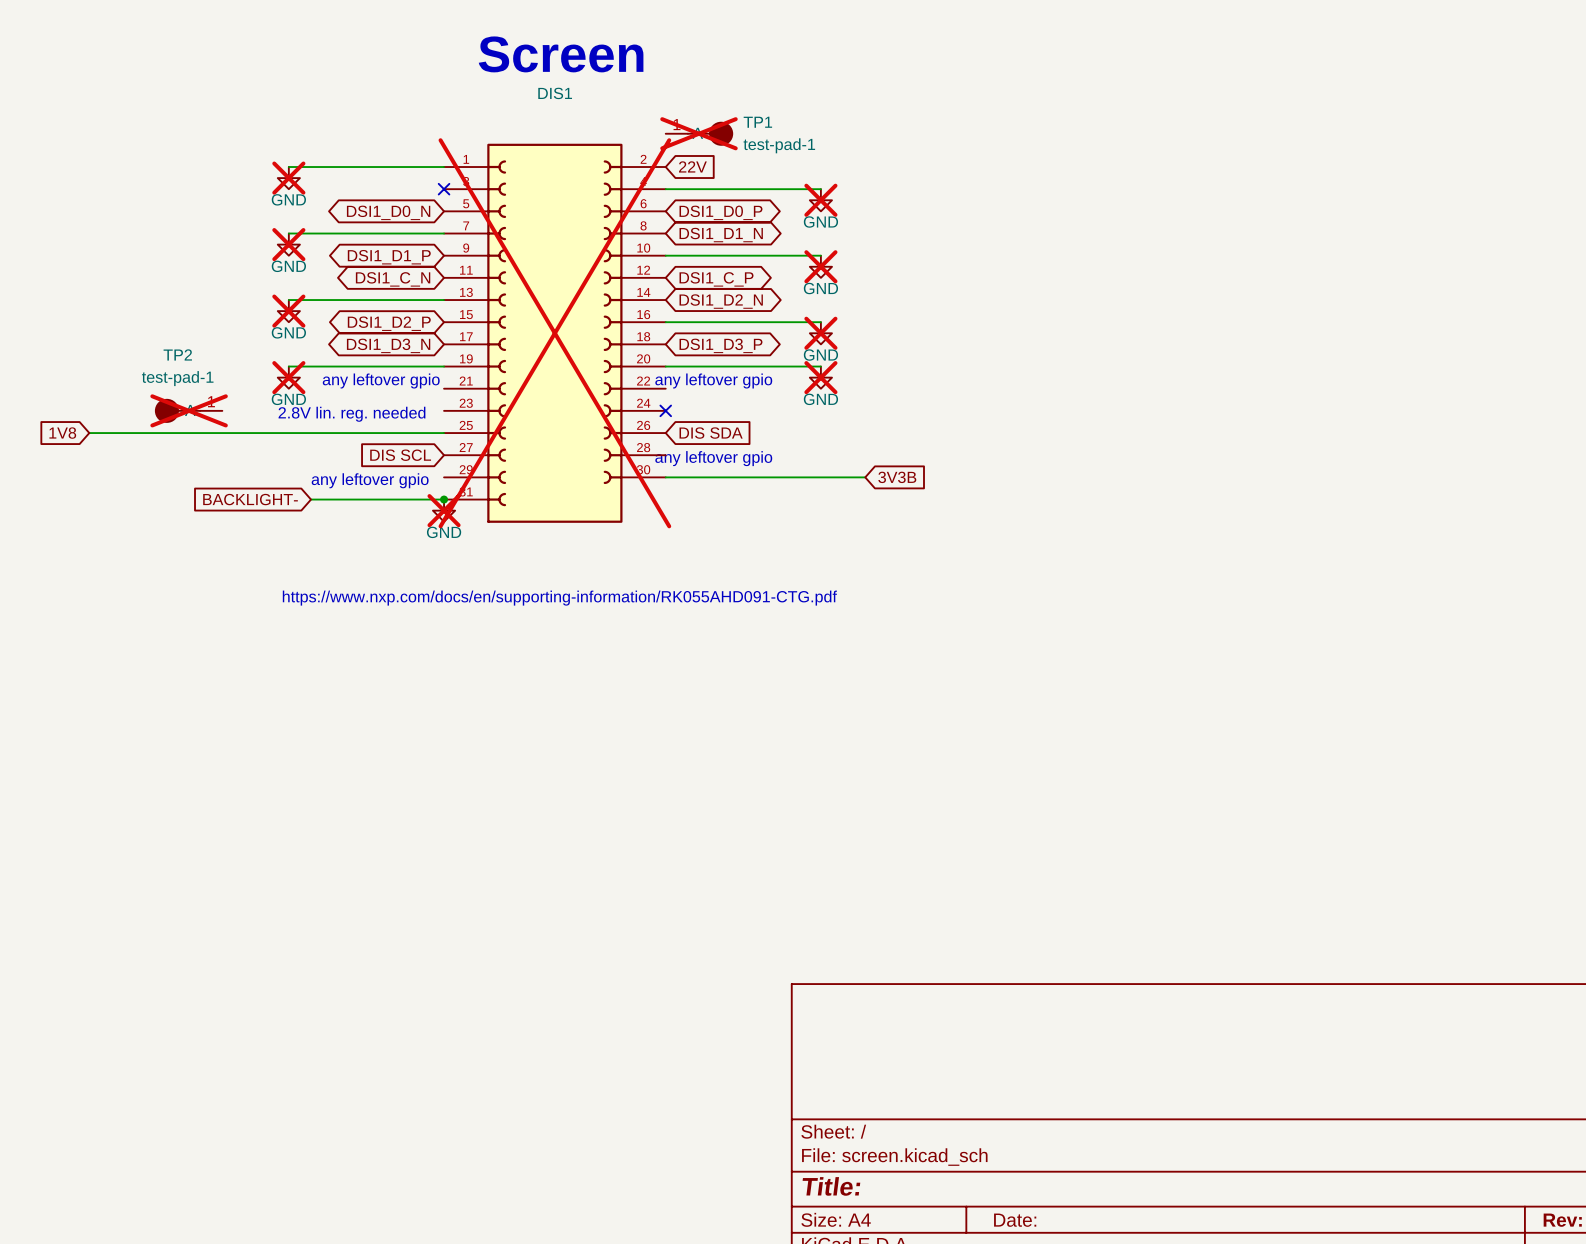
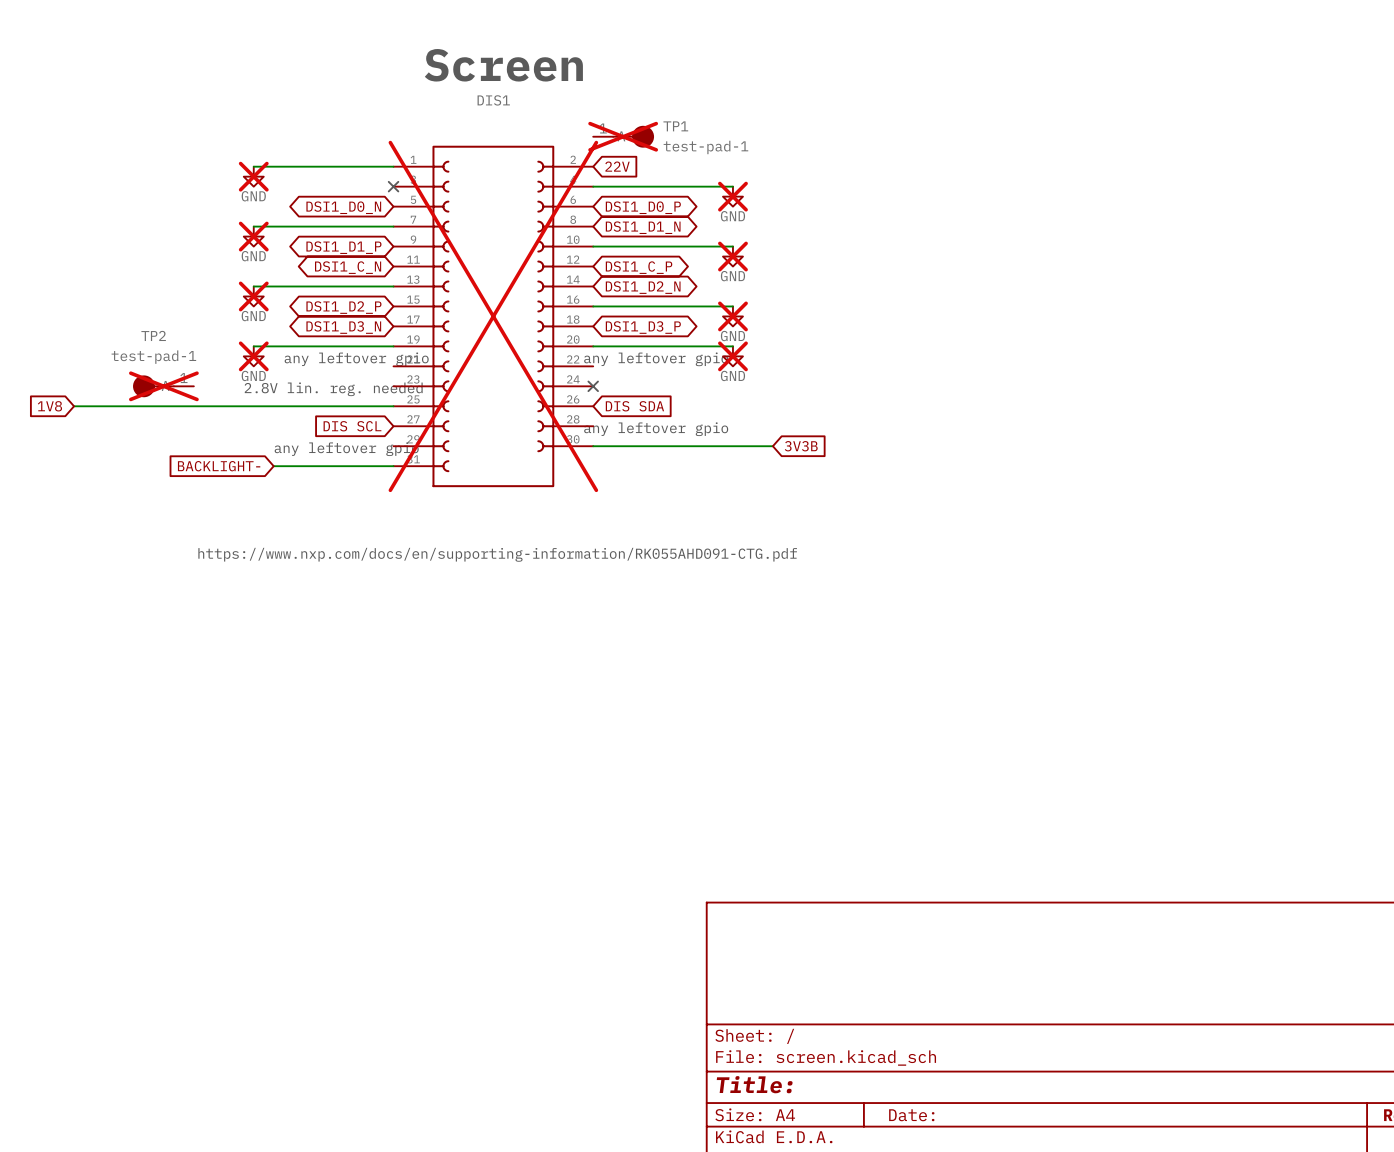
junction: (444, 499) -> none
power symbol: GND (444, 510) -> none

